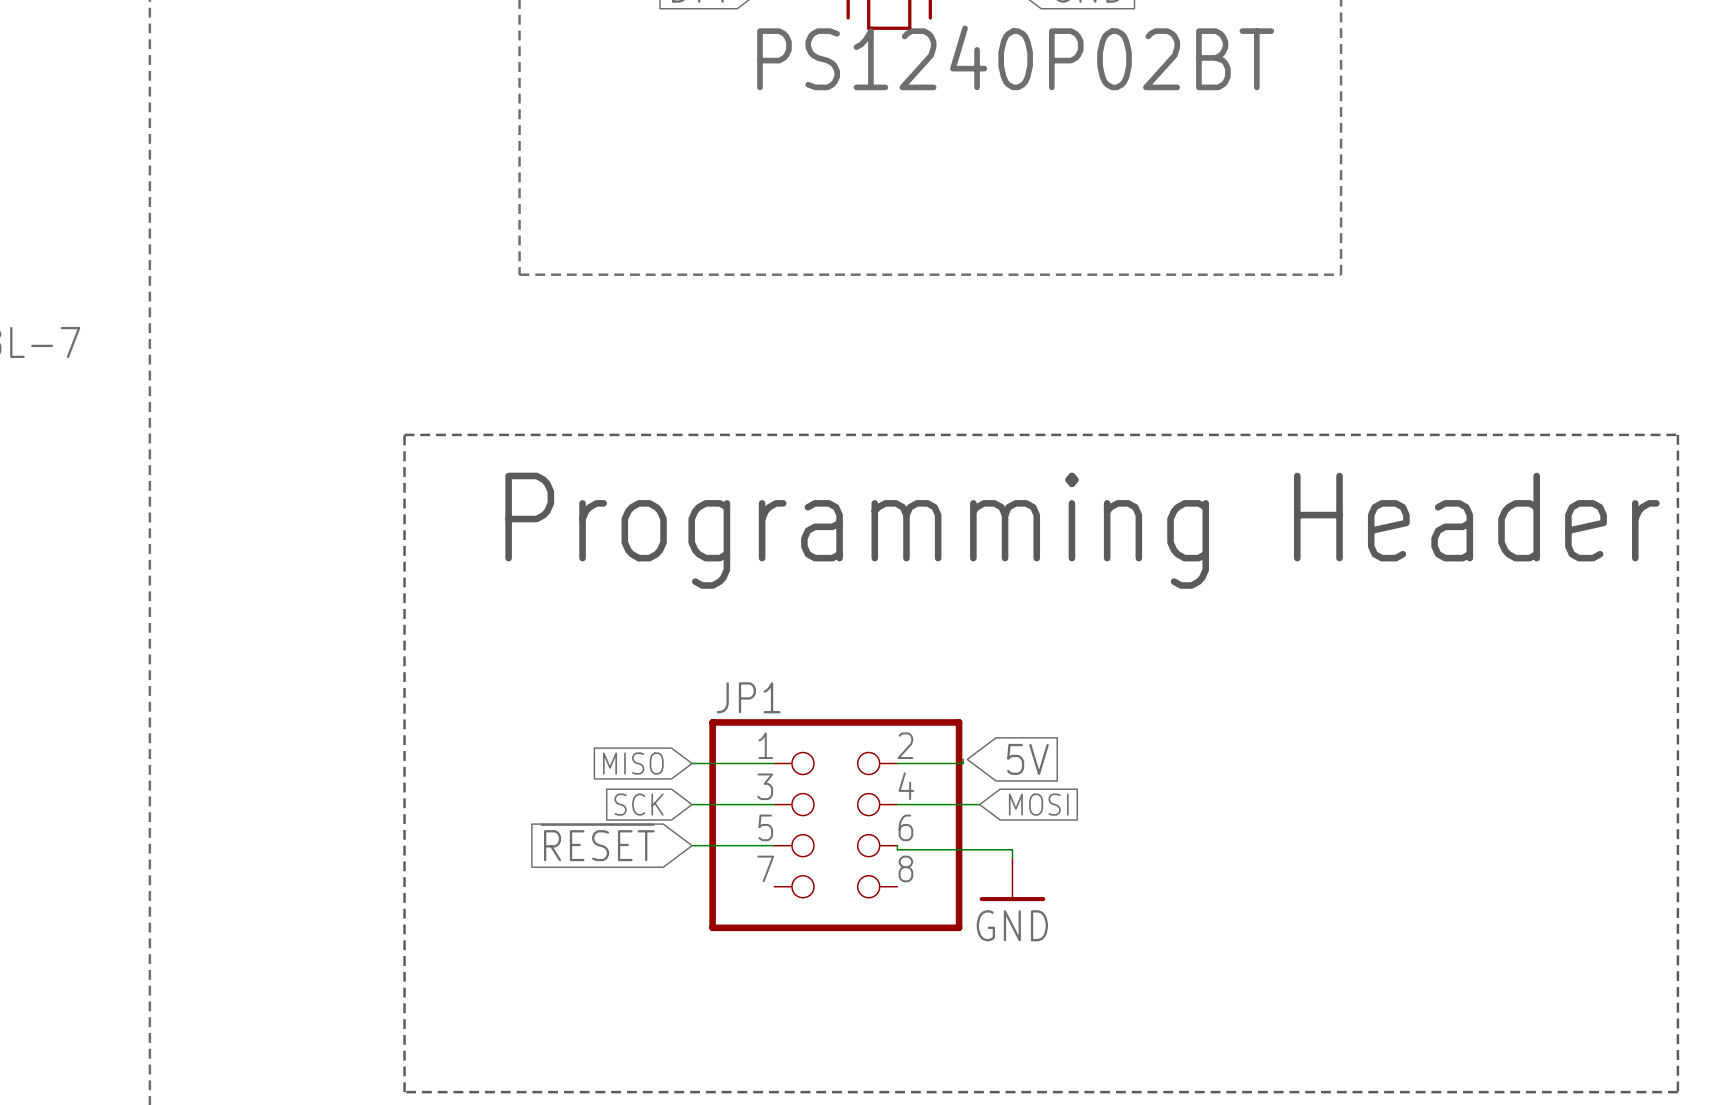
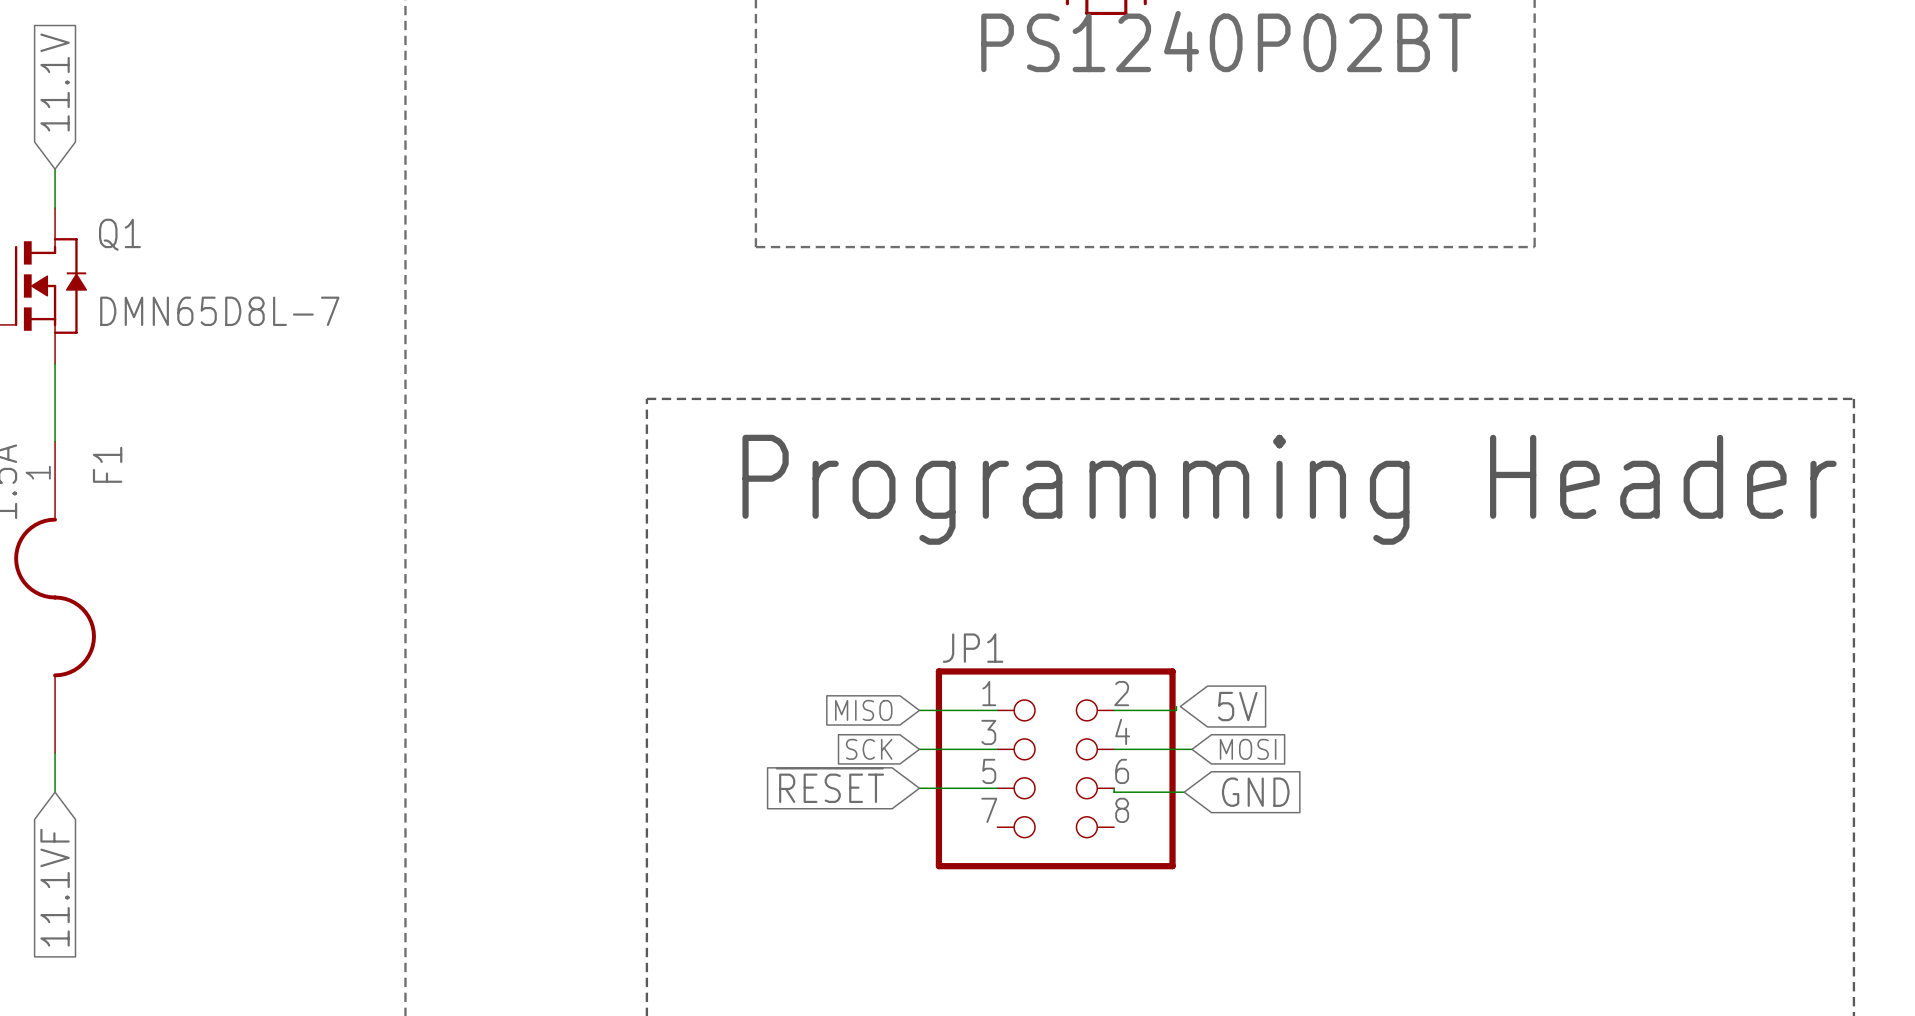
wire: (971, 849) (1012, 849) (1012, 857) -> none
global label: none -> GND (1255, 792)
power symbol: GND (1012, 879) -> none

